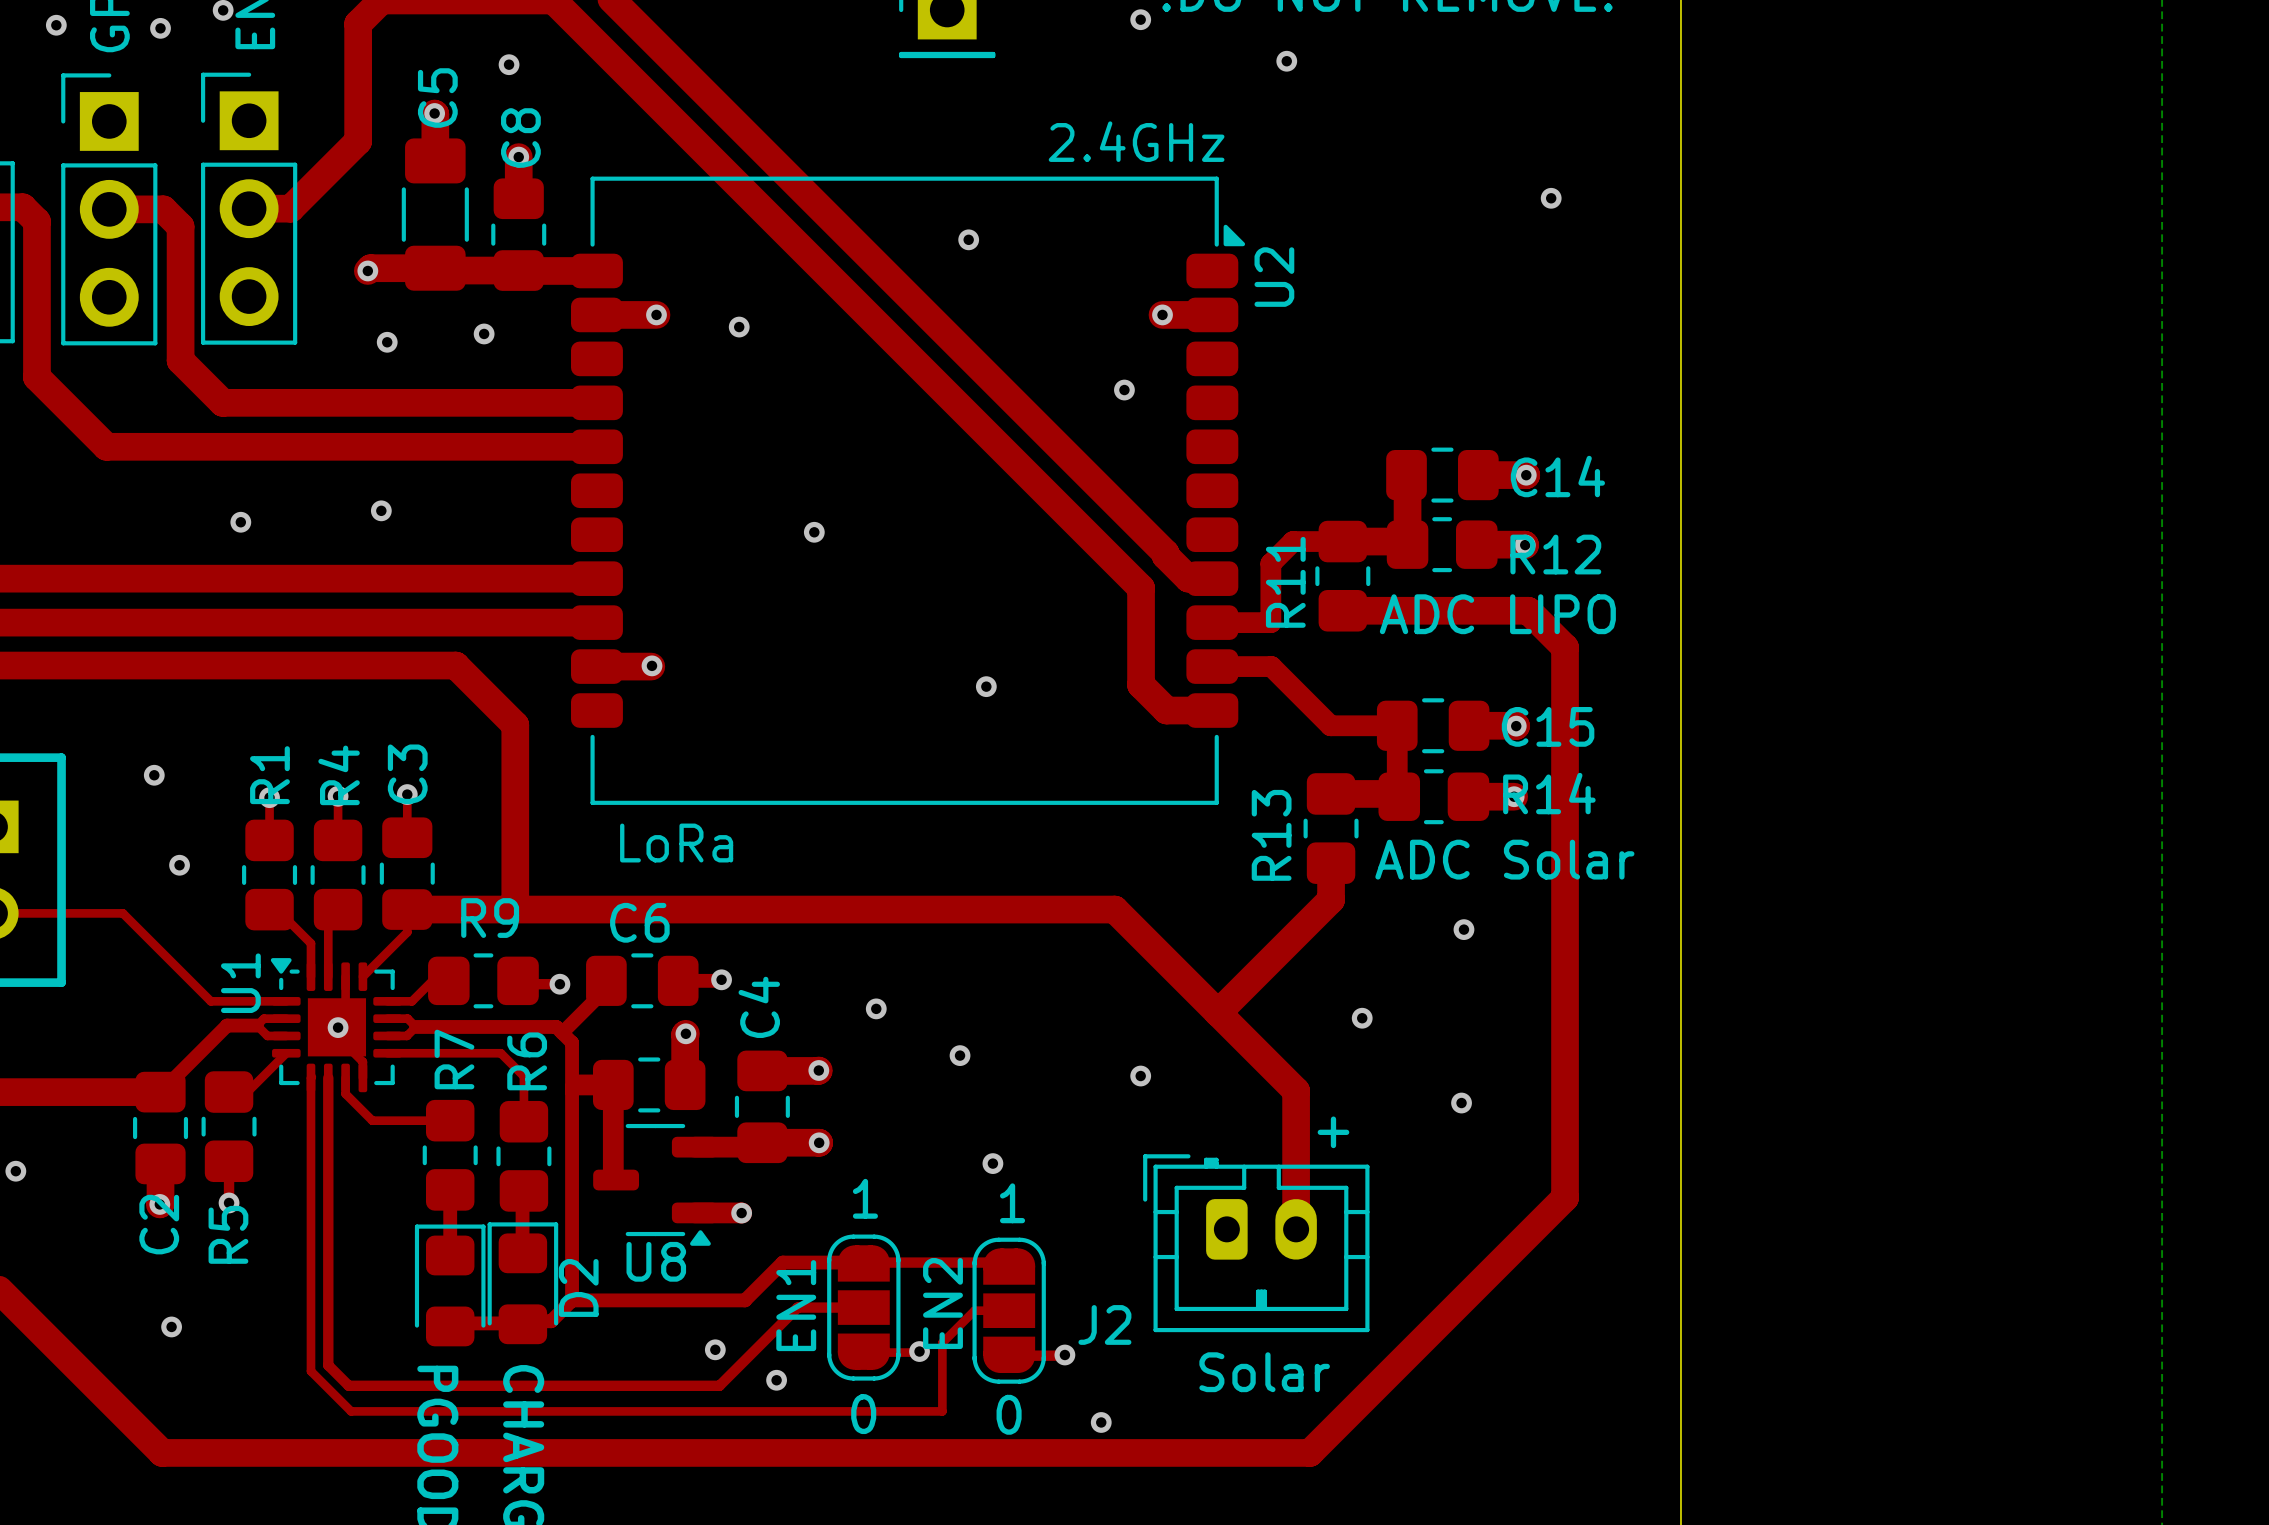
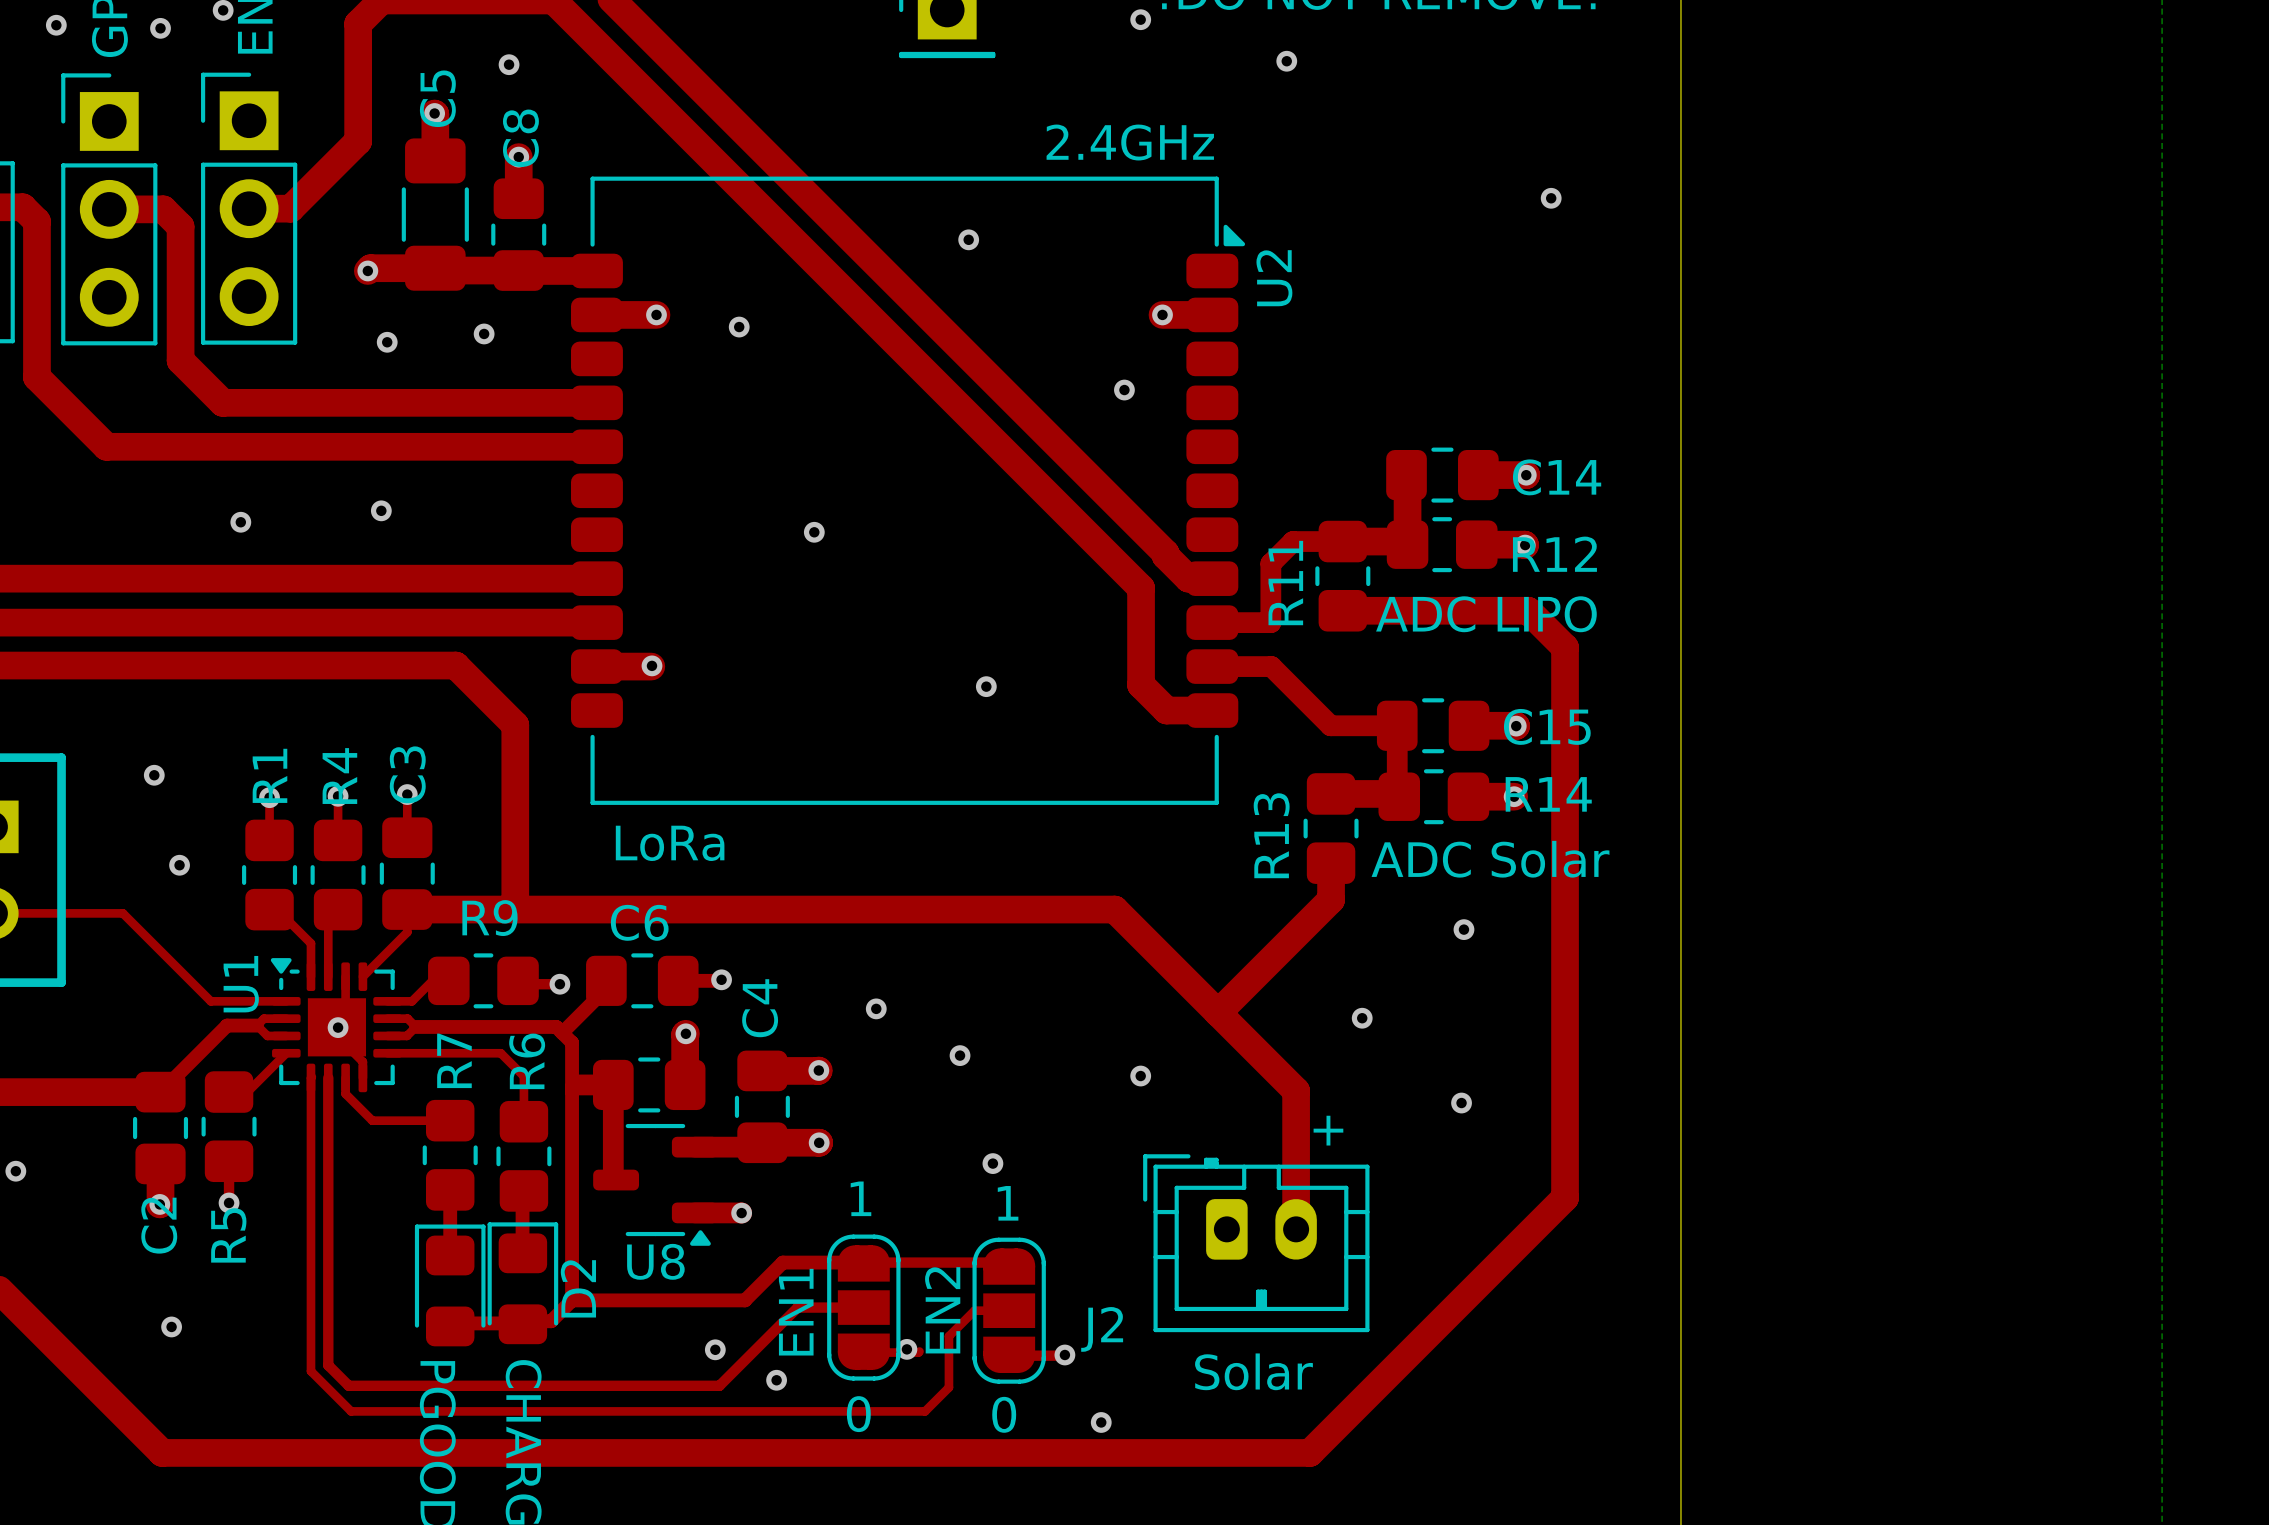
top track: (948, 1336) (942, 1342) (942, 1411) (925, 1411) -> (948, 1336) (948, 1387) (925, 1411)
via position: (919, 1351) -> (906, 1349)

